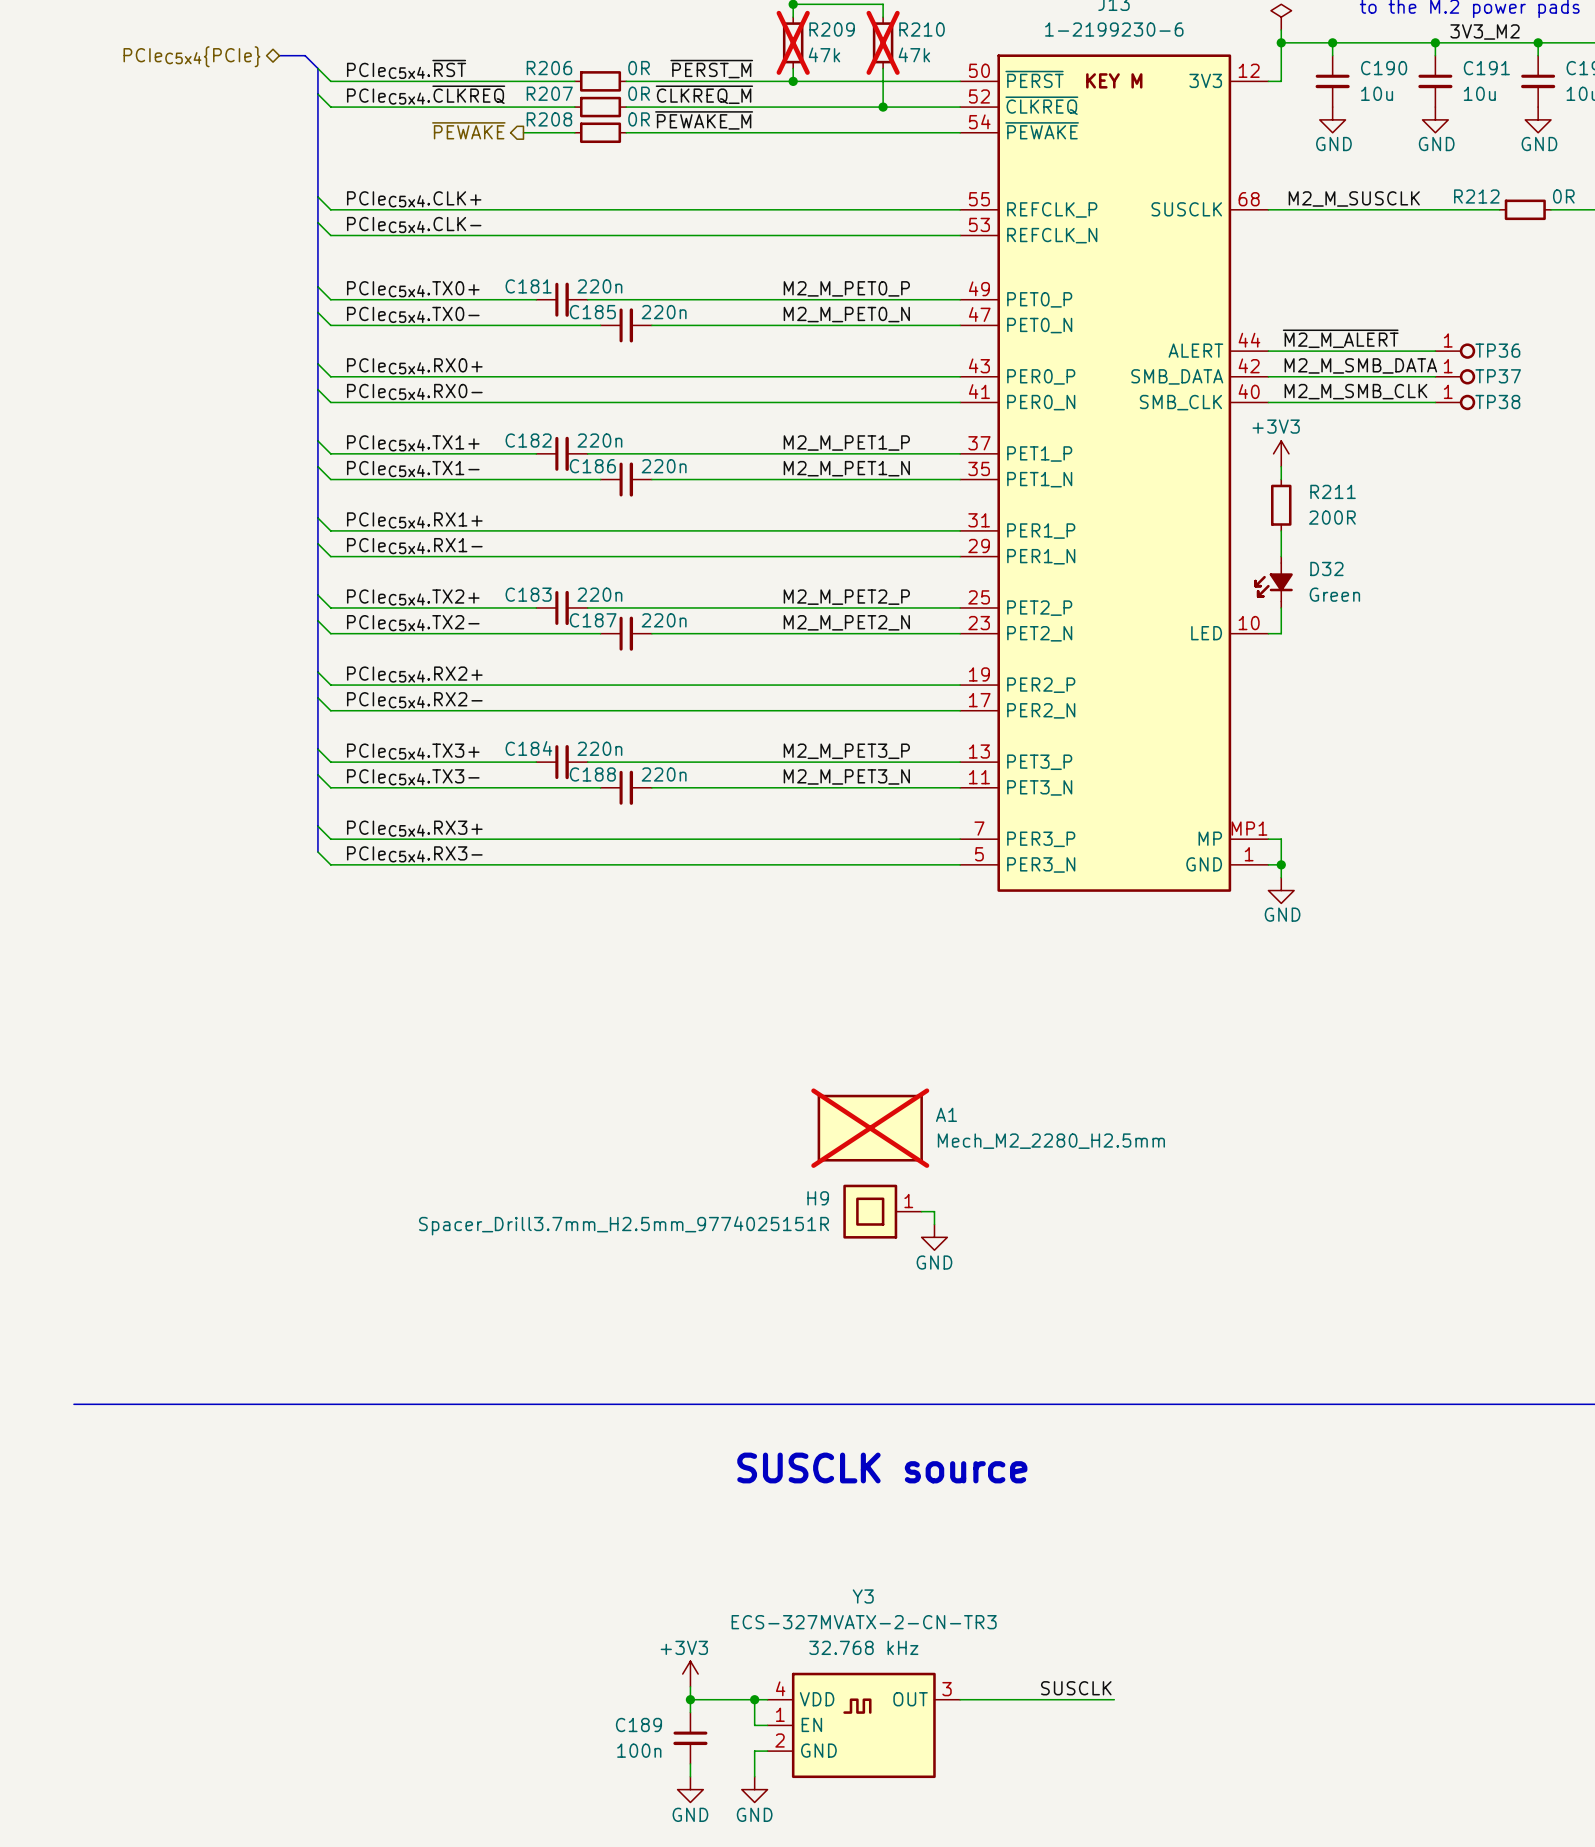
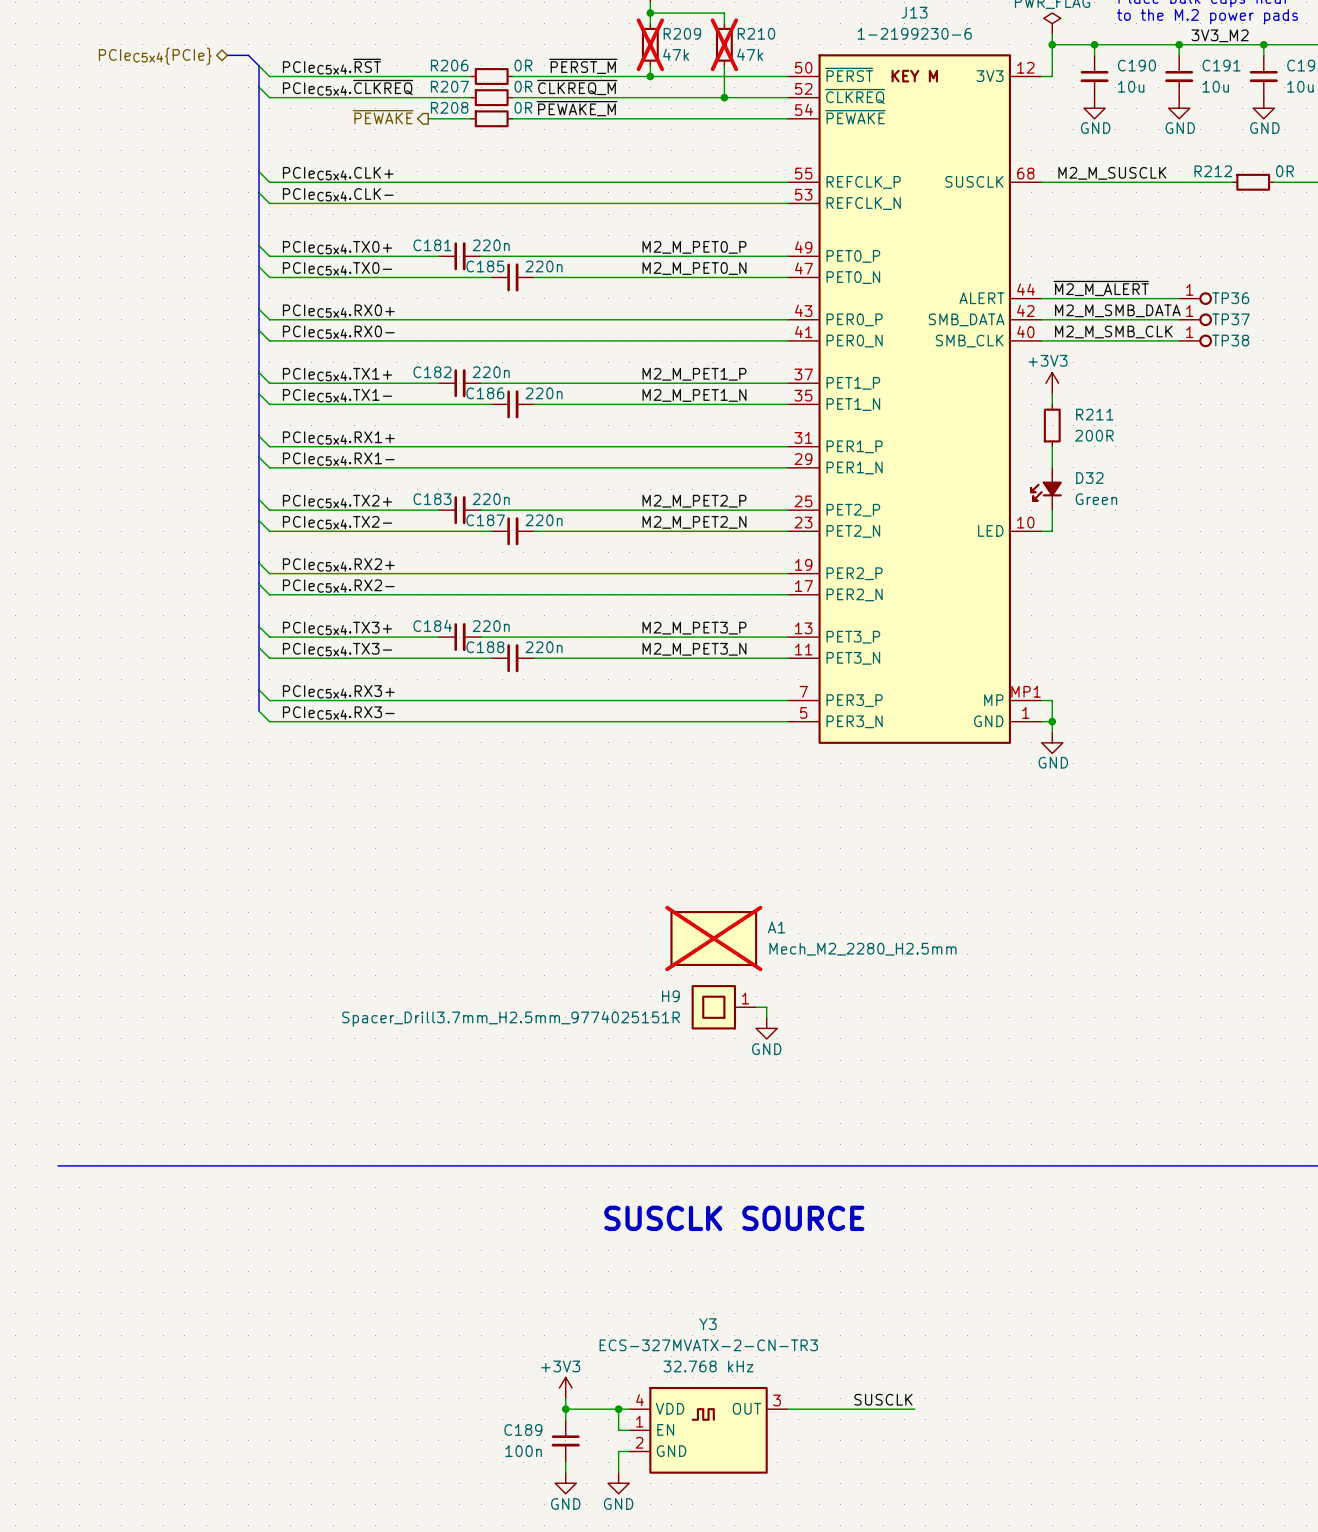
text: SUSCLK source (882, 1467) -> SUSCLK SOURCE (734, 1218)

